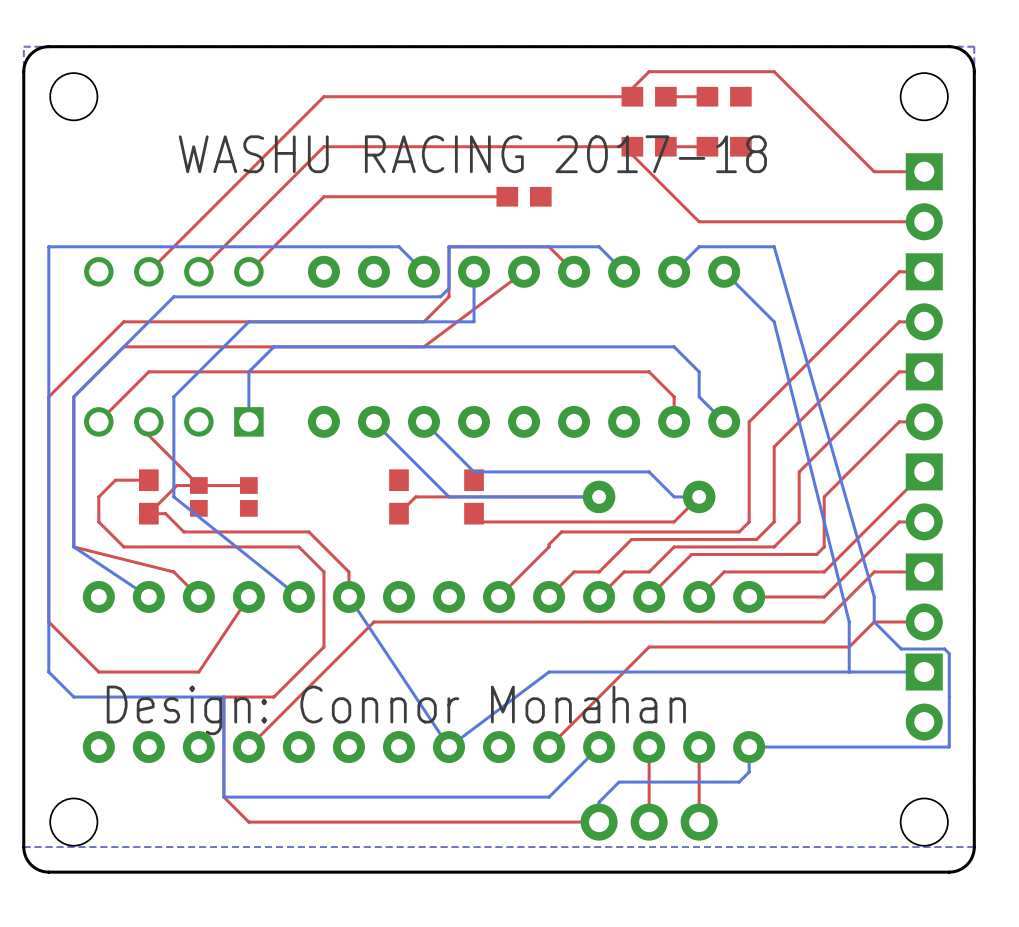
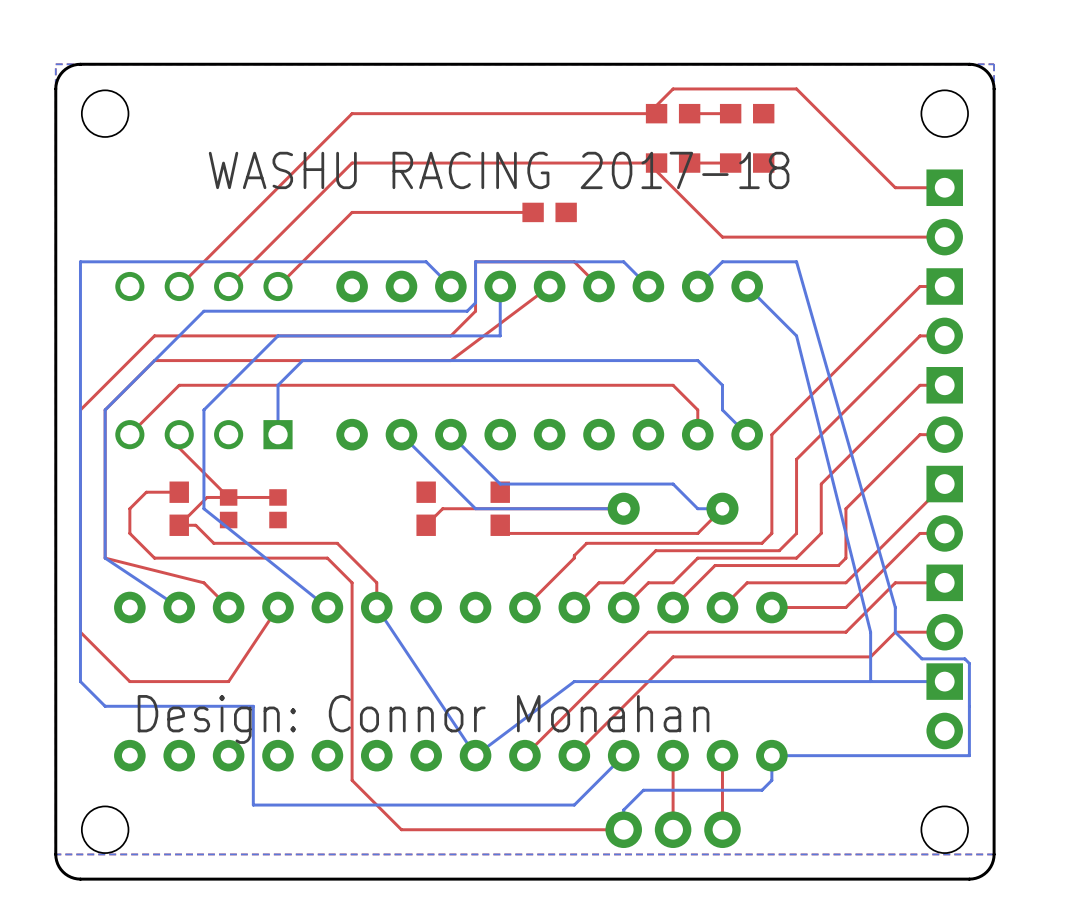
top track: (624, 622) (373, 622) (248, 747) -> (648, 632) (524, 755)
top track: (323, 647) (273, 697) (223, 697) (223, 797) (248, 822) (373, 822) -> (352, 656) (352, 780) (401, 829)

